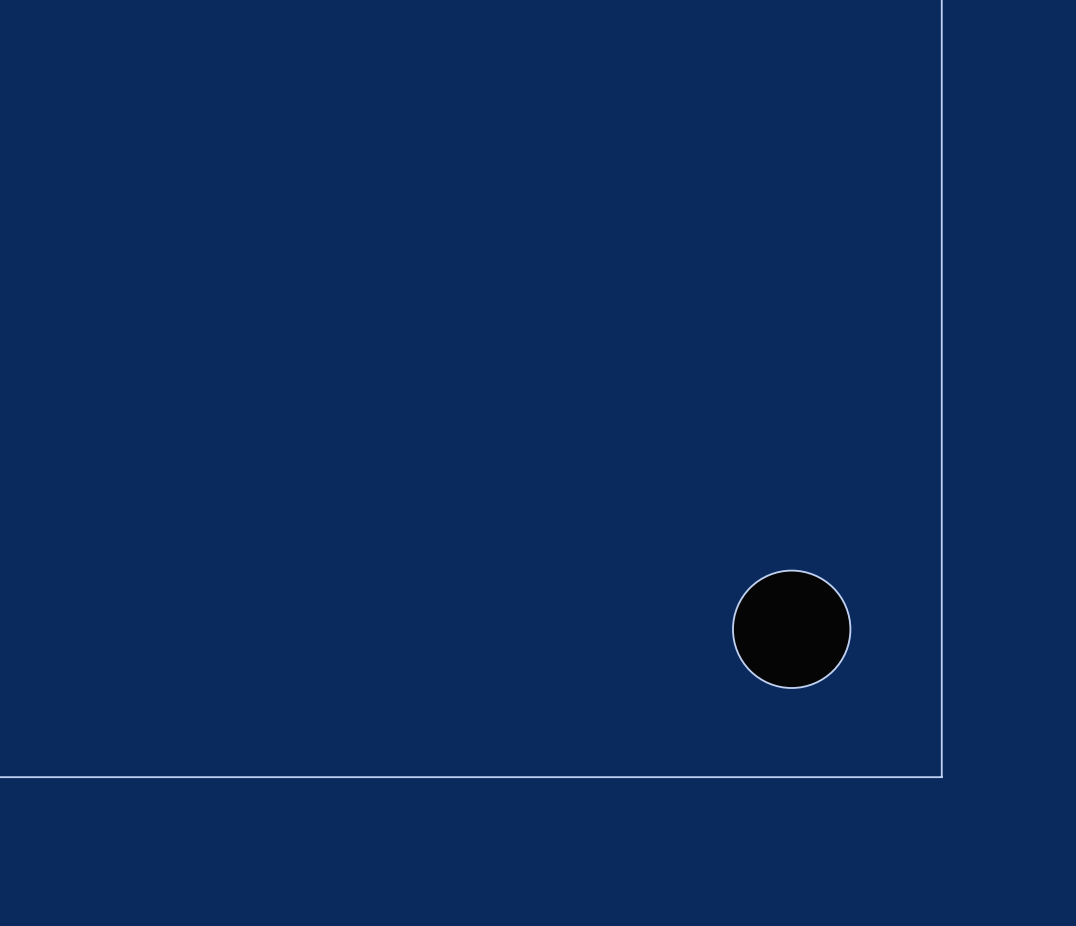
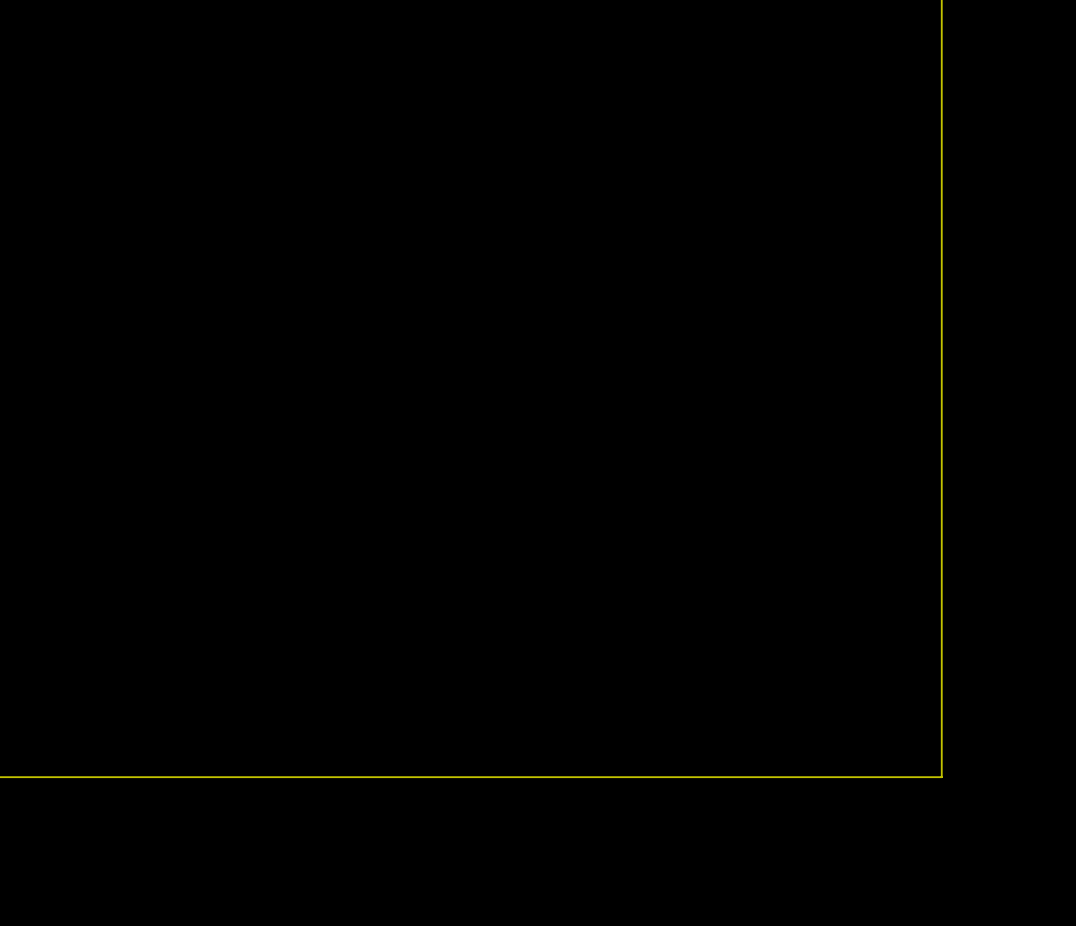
part: (791, 629) -> none

